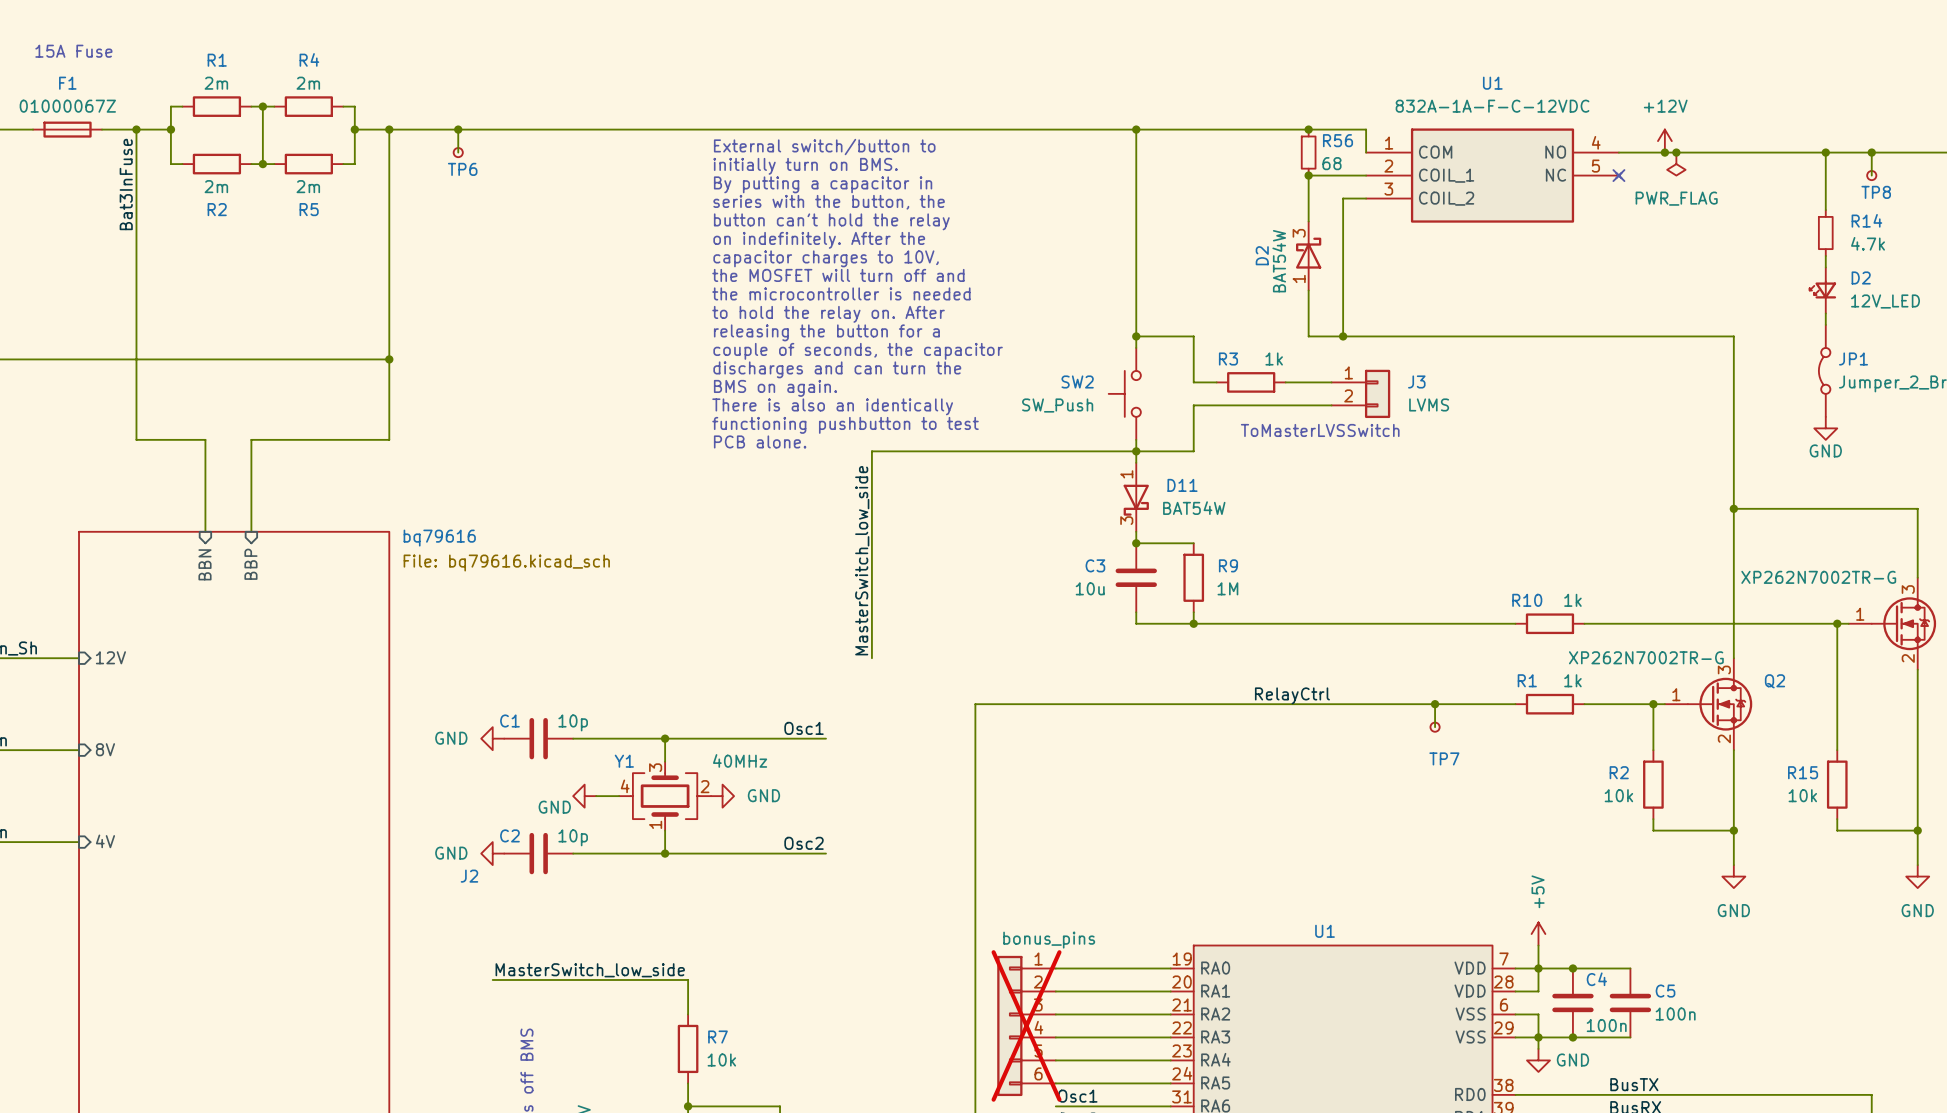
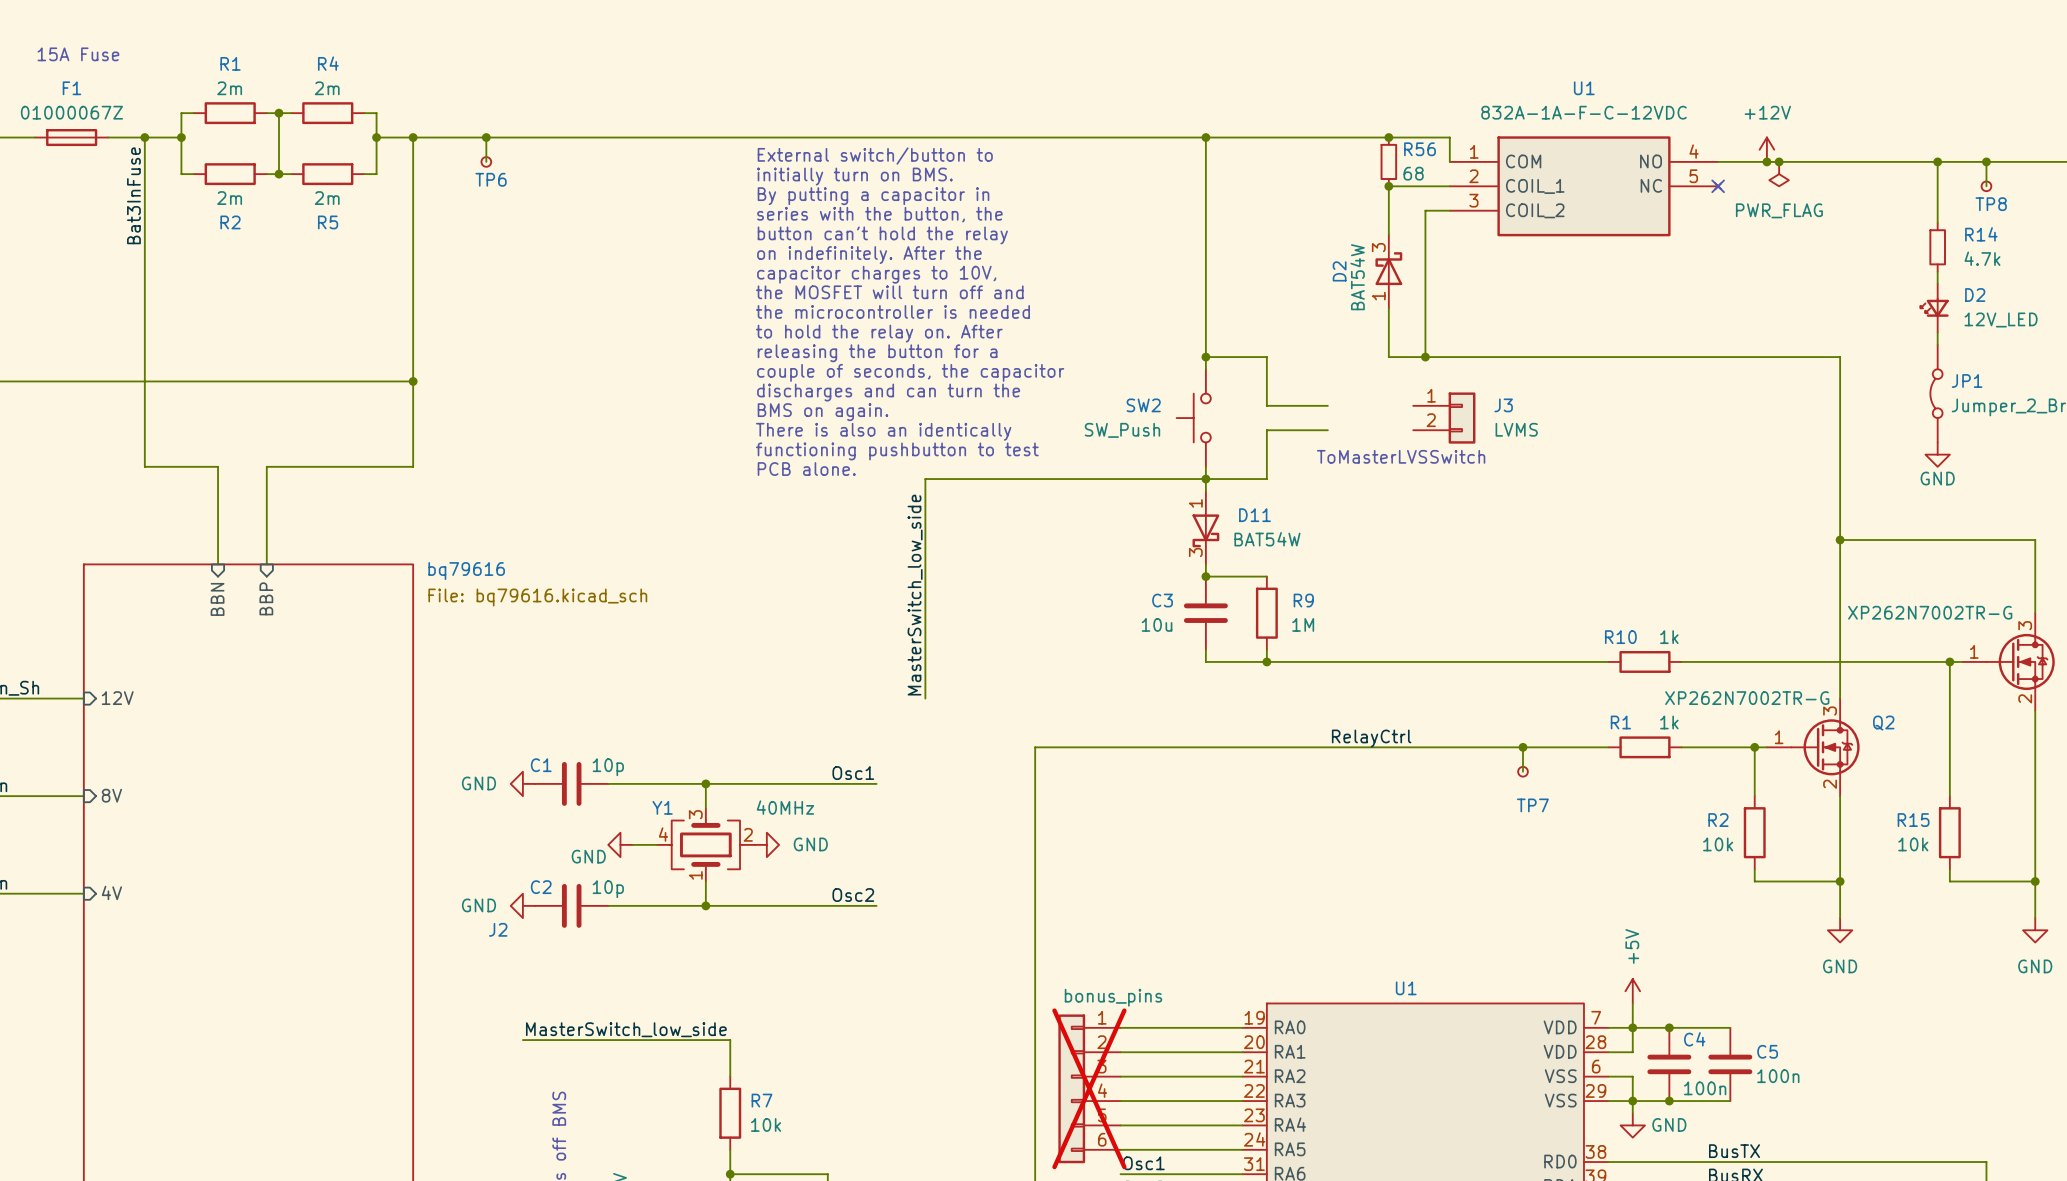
wire: none -> (1291, 405) (1327, 405)
R3: 1k (1251, 382) -> none
wire: (1285, 382) (1331, 382) -> none
wire: (1251, 405) (1331, 405) -> none

